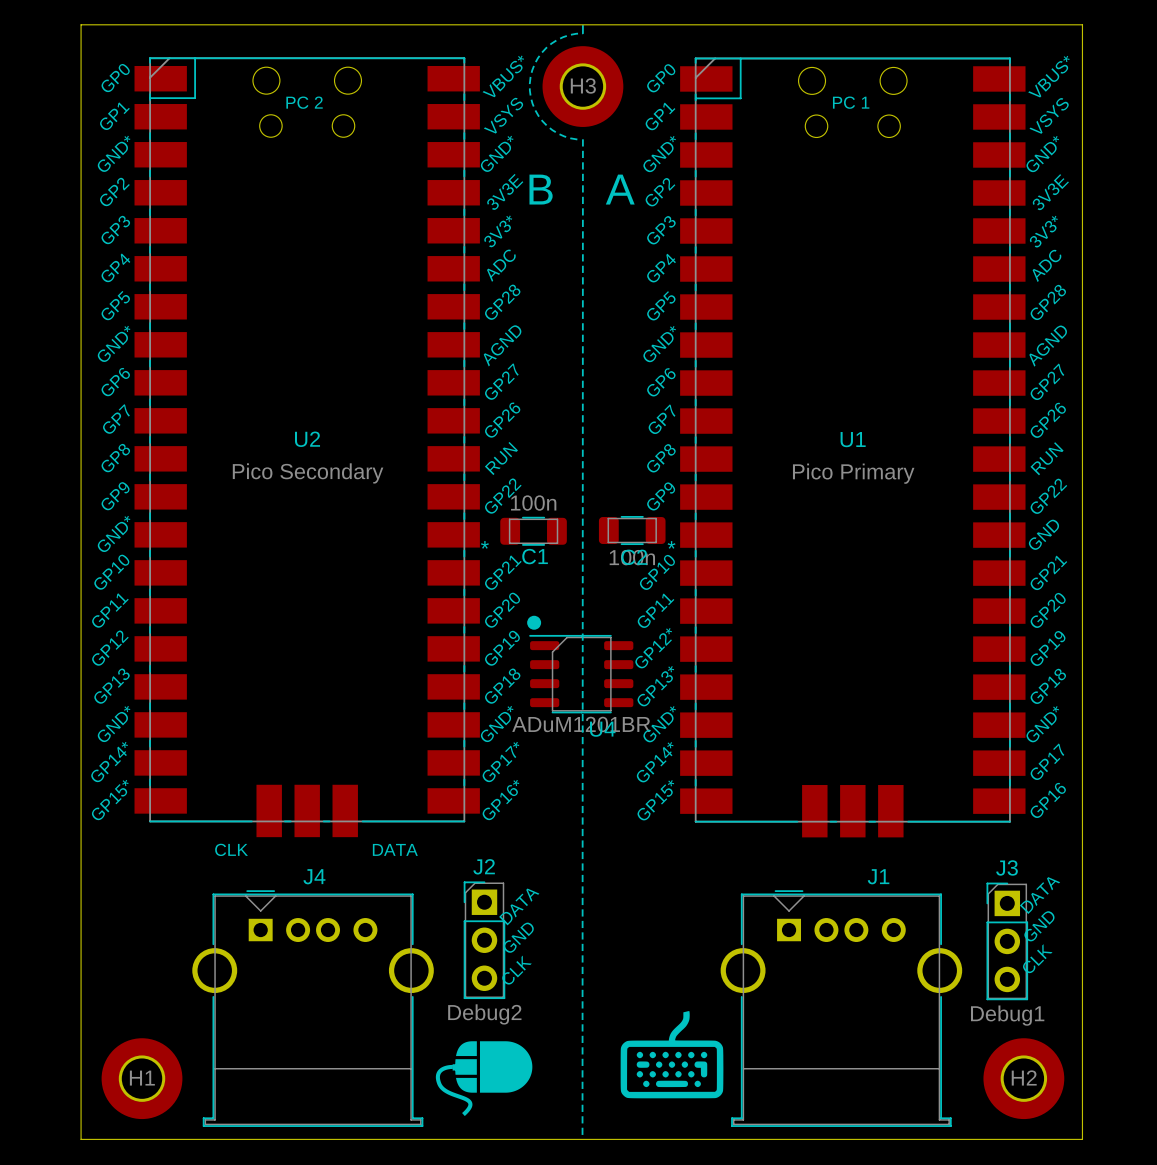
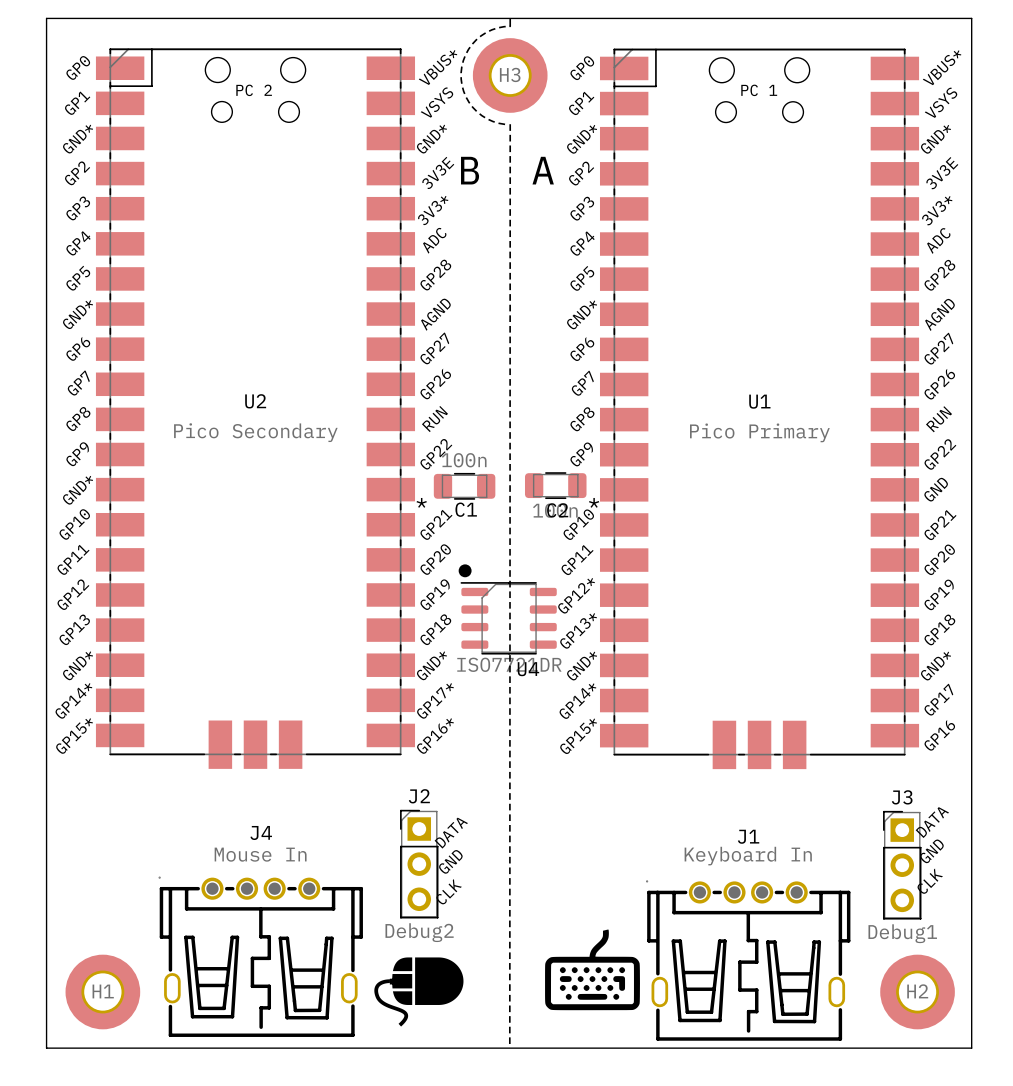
U4 value: ADuM1201BR (581, 724) -> ISO7721DR (509, 664)
U2 text: CLK (231, 849) -> none
U2 text: DATA (395, 849) -> none
J1 name position: J1 (878, 876) -> J1 (748, 836)
J4 footprint: [192, 890, 434, 1127] -> [158, 876, 363, 1037]
J1 footprint: [720, 890, 963, 1127] -> [646, 880, 851, 1041]
J4 value: none -> Mouse In (260, 854)
J1 value: none -> Keyboard In (748, 856)

